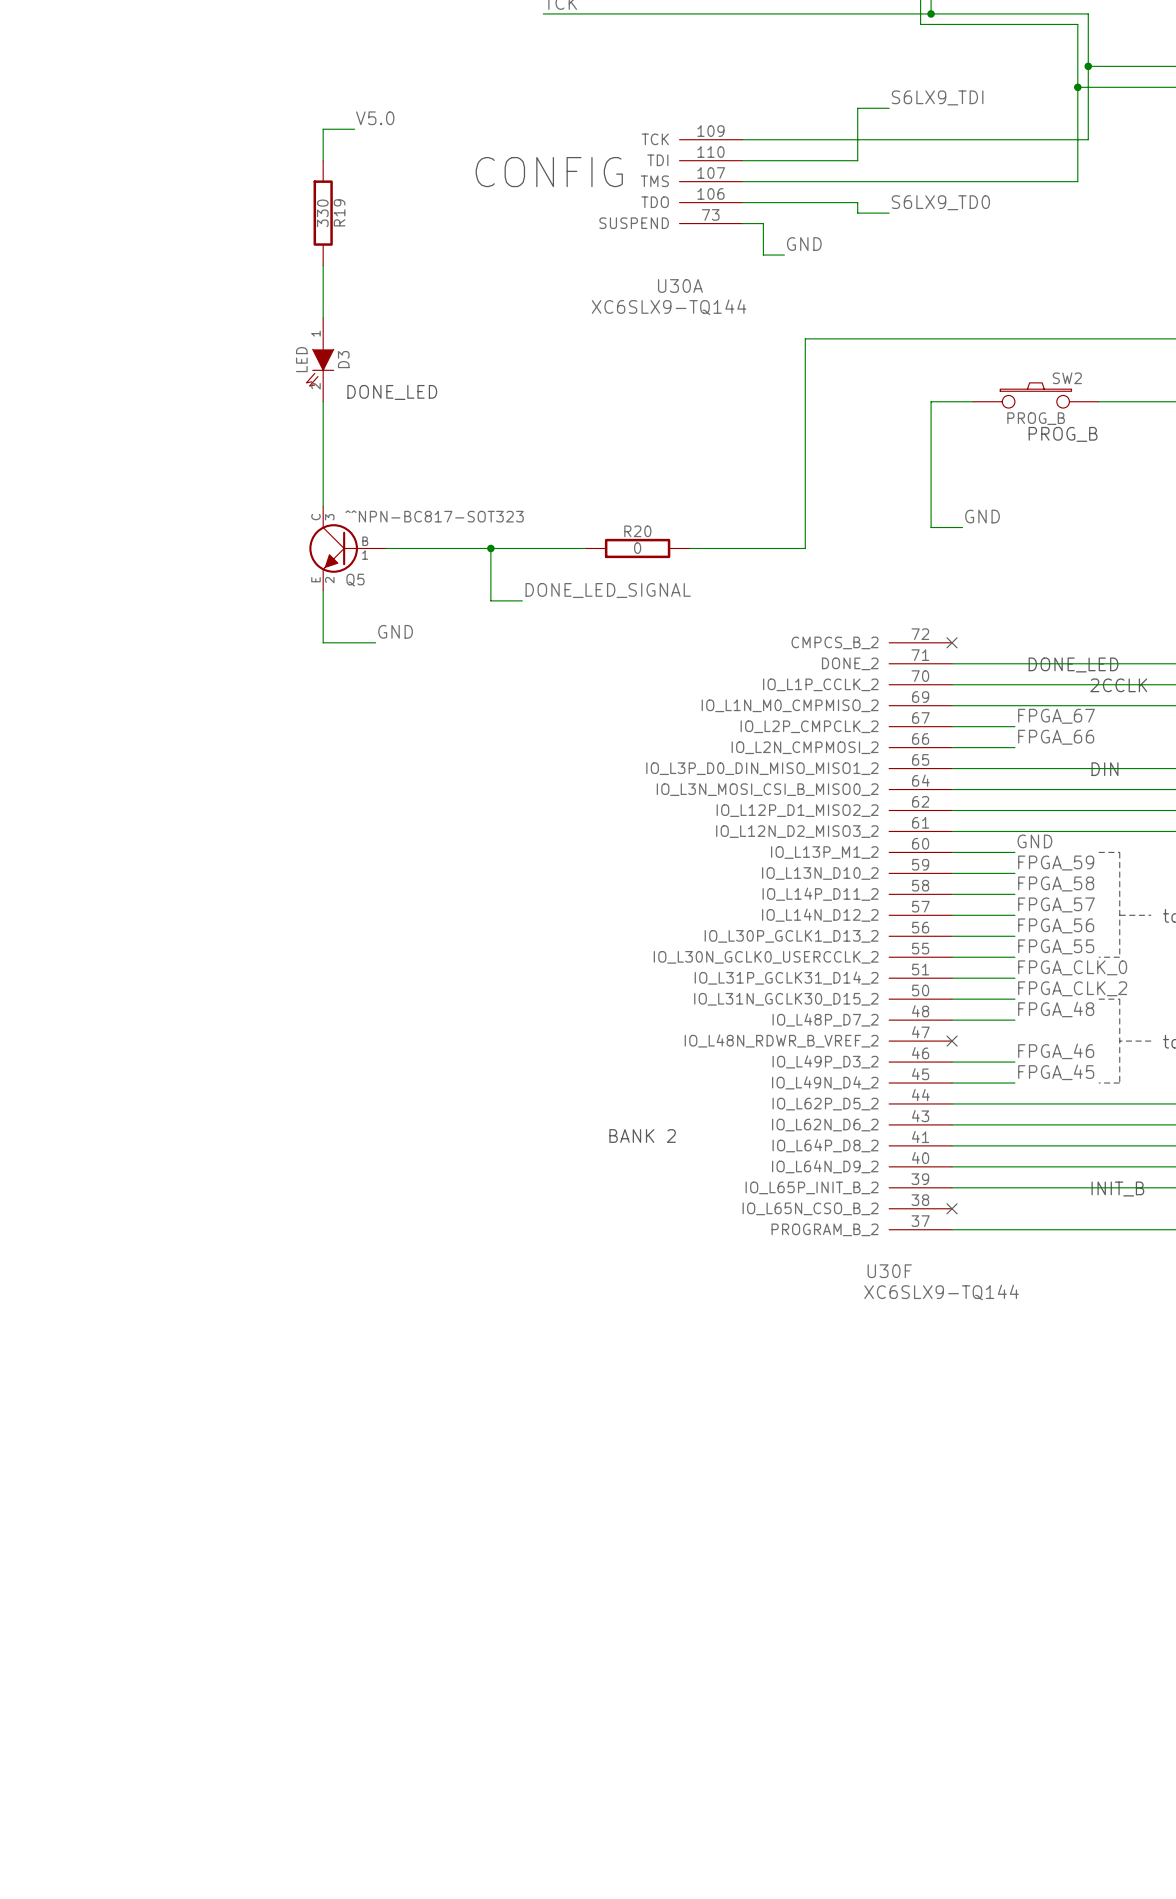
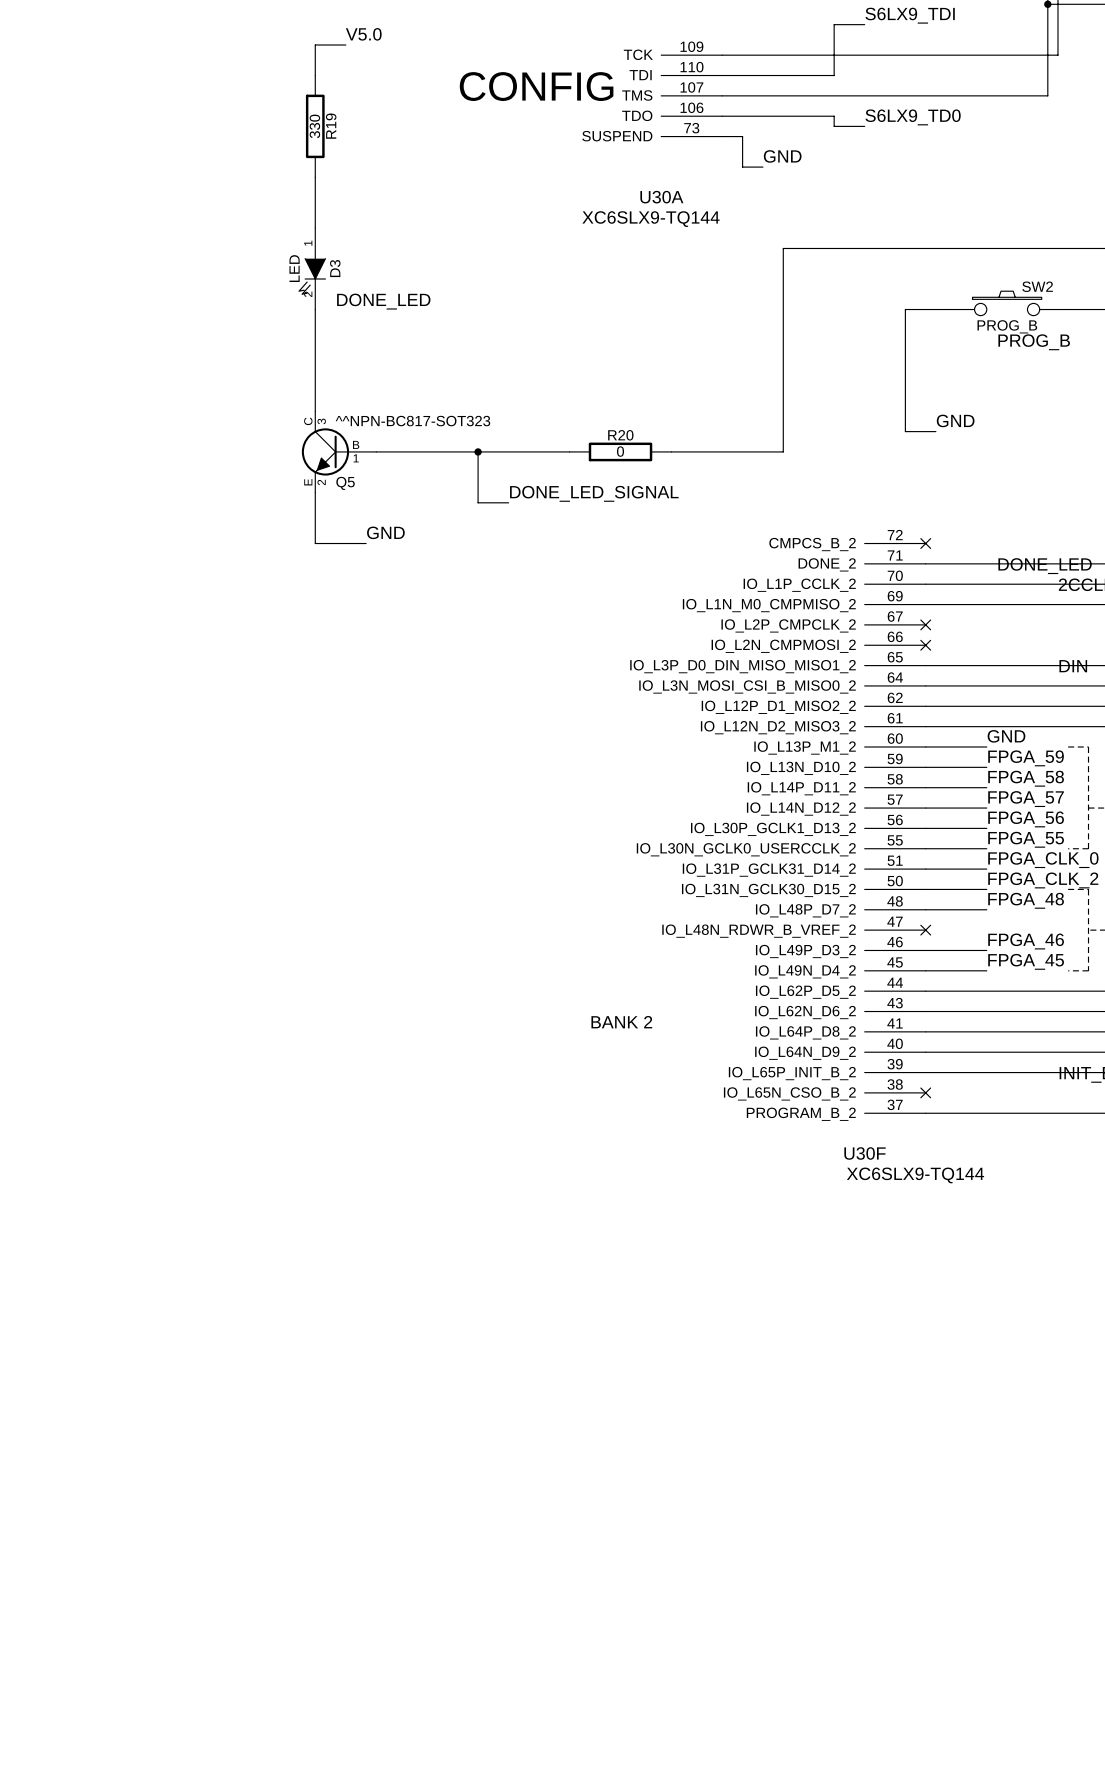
label: FPGA_67 (1056, 716) -> none
wire: (952, 726) (1014, 726) -> none
no-connect mark: none -> (925, 624)
label: FPGA_66 (1056, 737) -> none
wire: (952, 747) (1014, 747) -> none
no-connect mark: none -> (925, 645)

